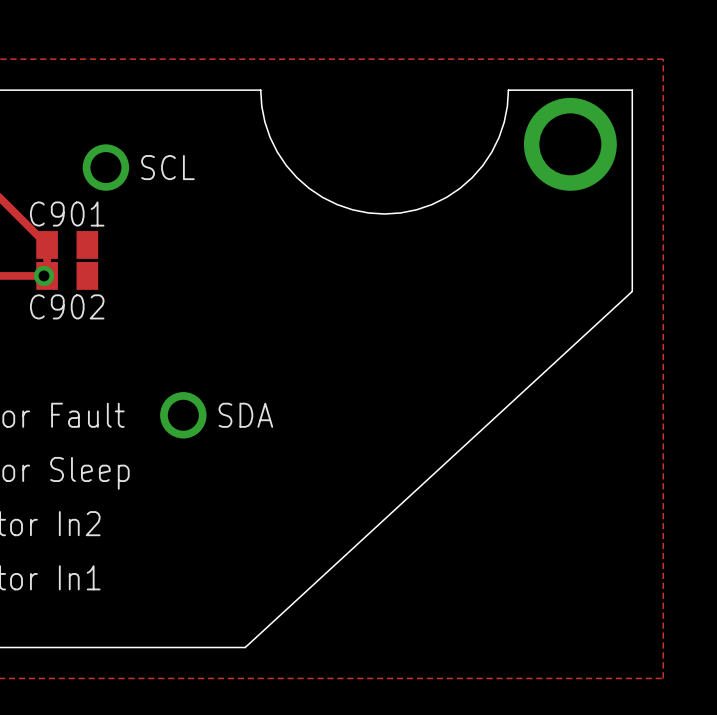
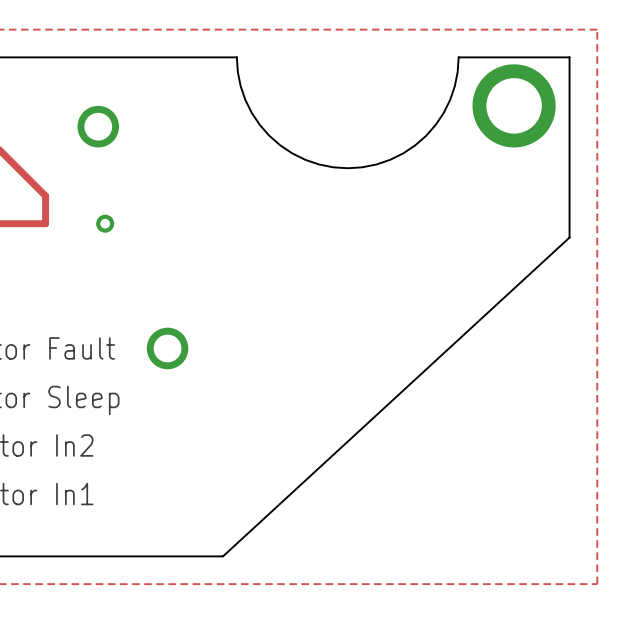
text: SCL (167, 167) -> none
C901: (67, 244) -> none
via position: (43, 275) -> (105, 223)
C902: (67, 275) -> none
text: SDA (245, 415) -> none

